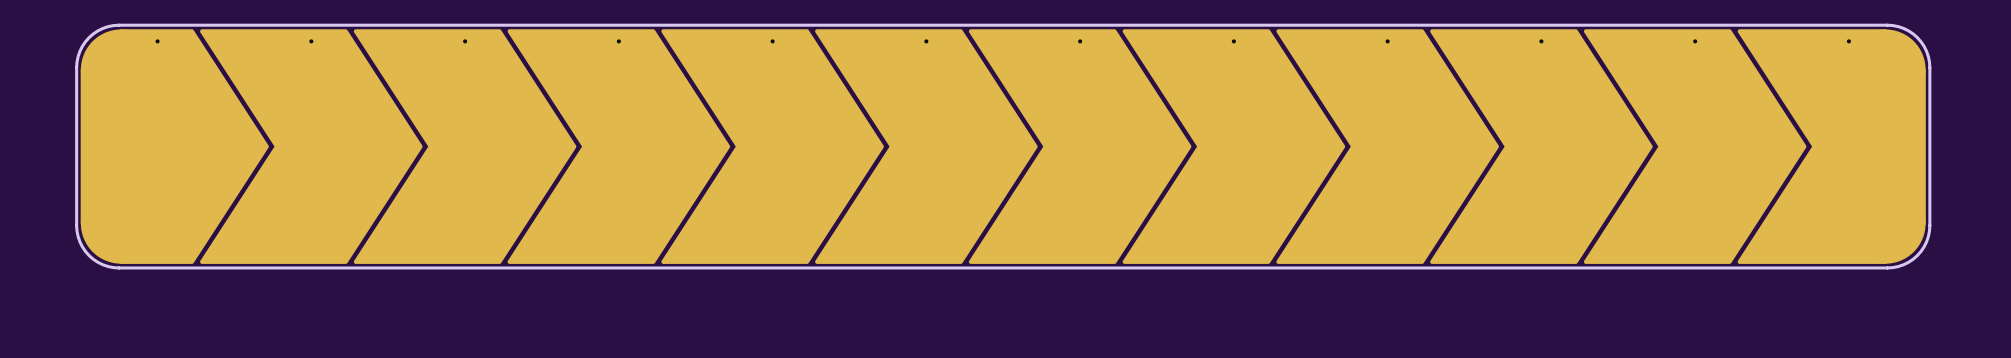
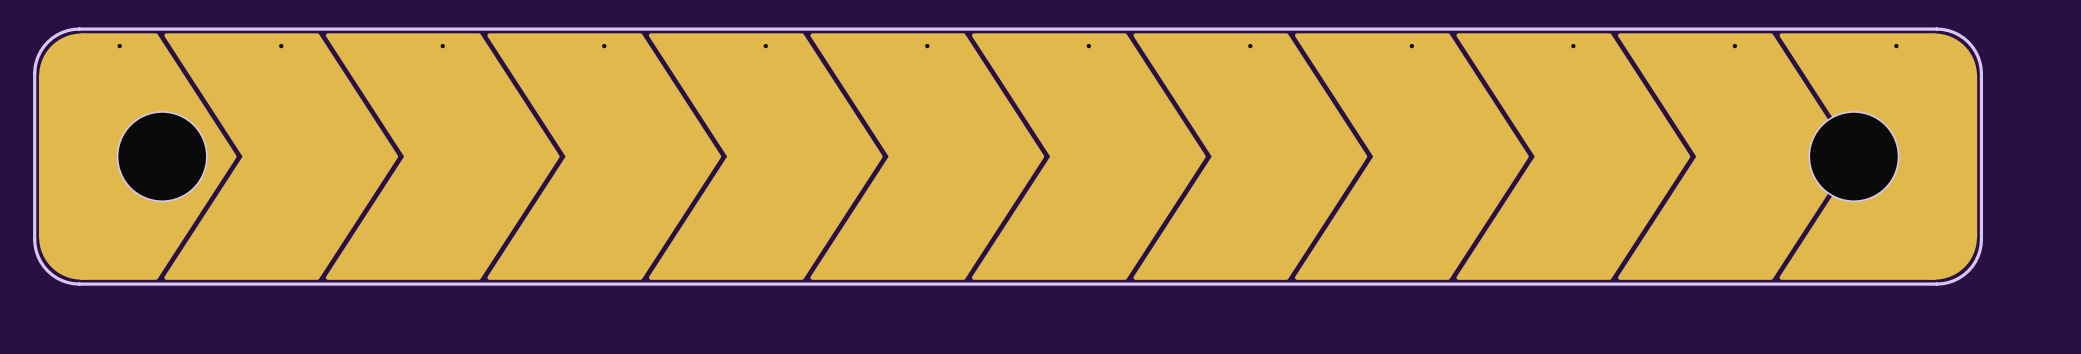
part: none -> (162, 156)
part: none -> (1853, 156)

